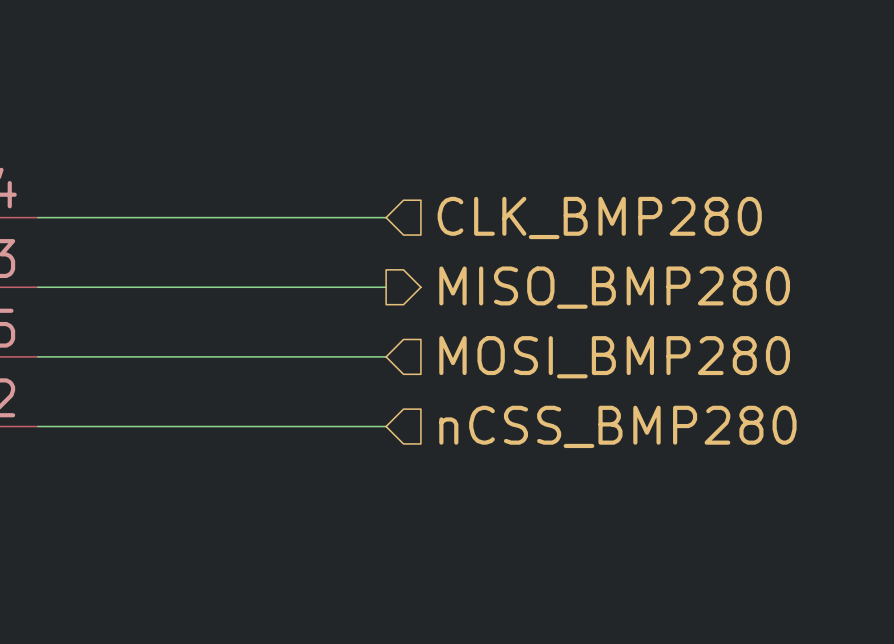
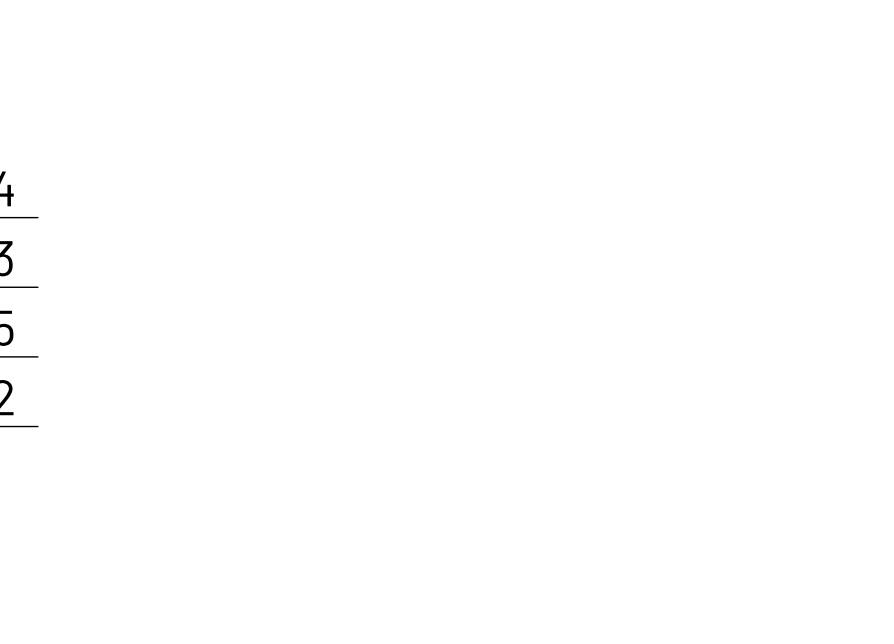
wire: (37, 217) (386, 217) -> none
hierarchical label: CLK_BMP280 (599, 217) -> none
wire: (37, 287) (386, 287) -> none
hierarchical label: MISO_BMP280 (614, 287) -> none
wire: (37, 356) (386, 356) -> none
hierarchical label: MOSI_BMP280 (614, 357) -> none
wire: (37, 426) (386, 426) -> none
hierarchical label: nCSS_BMP280 (617, 426) -> none

